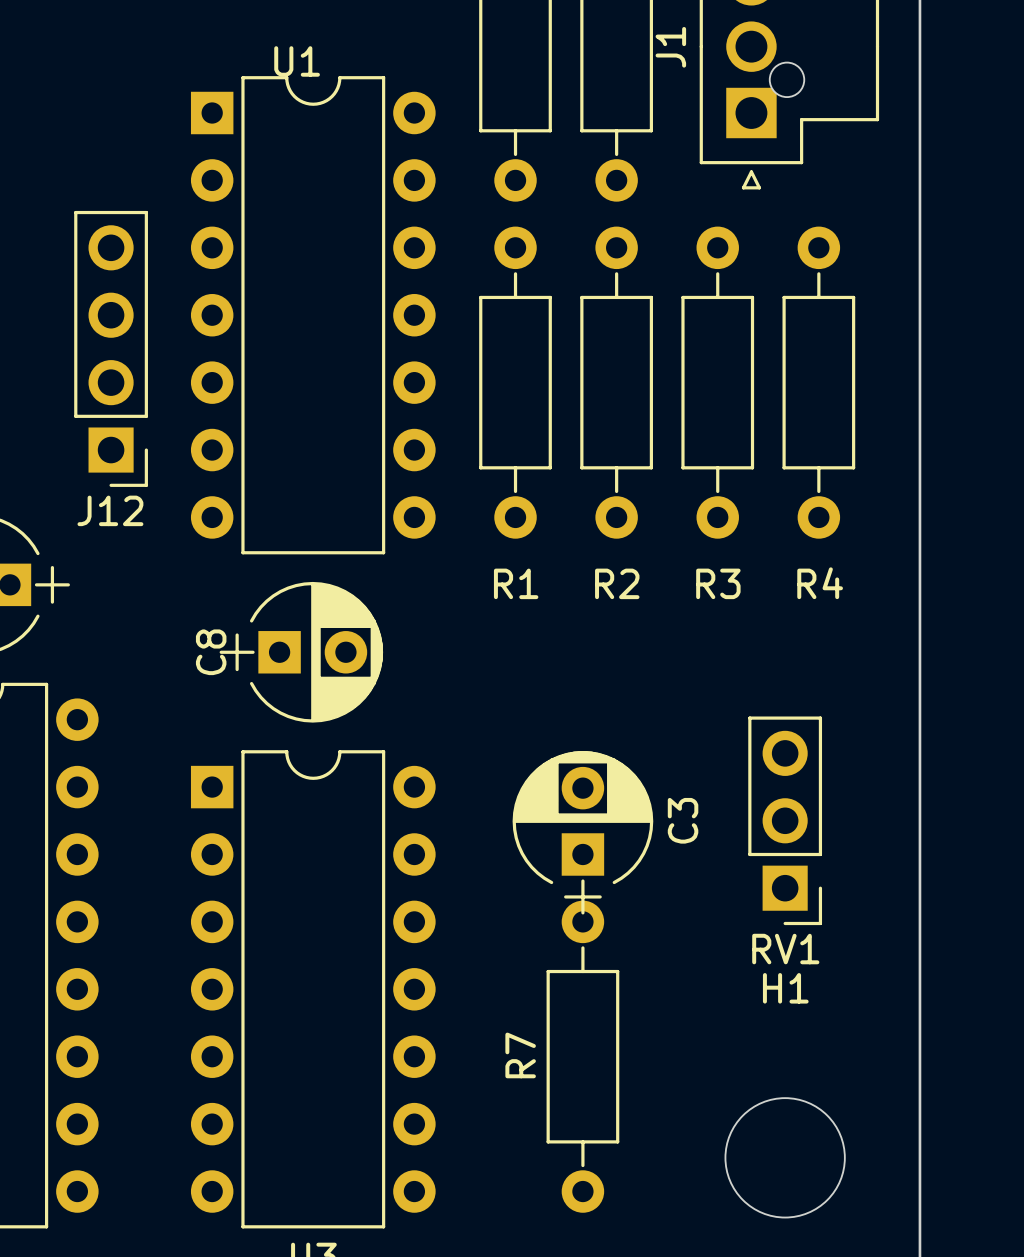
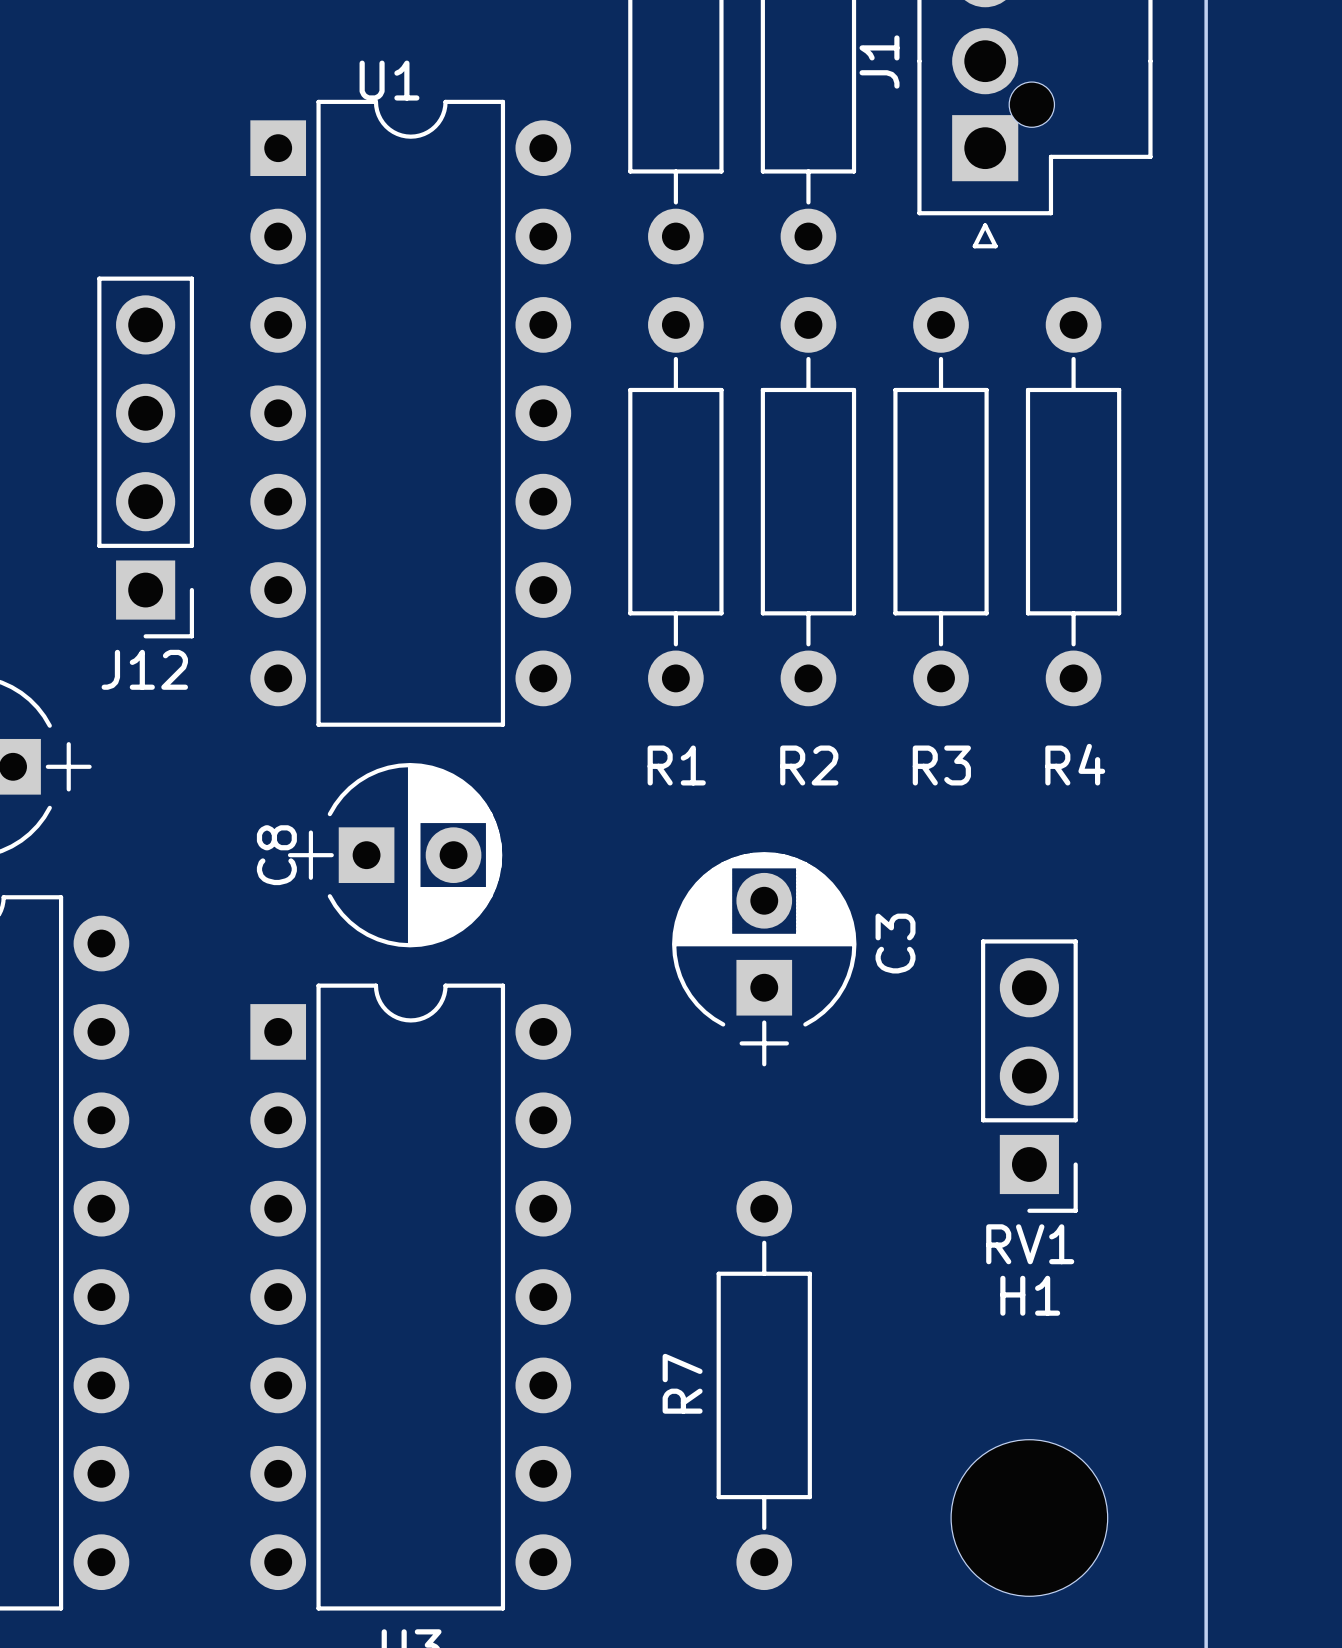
C3 position: (582, 832) -> (764, 959)

